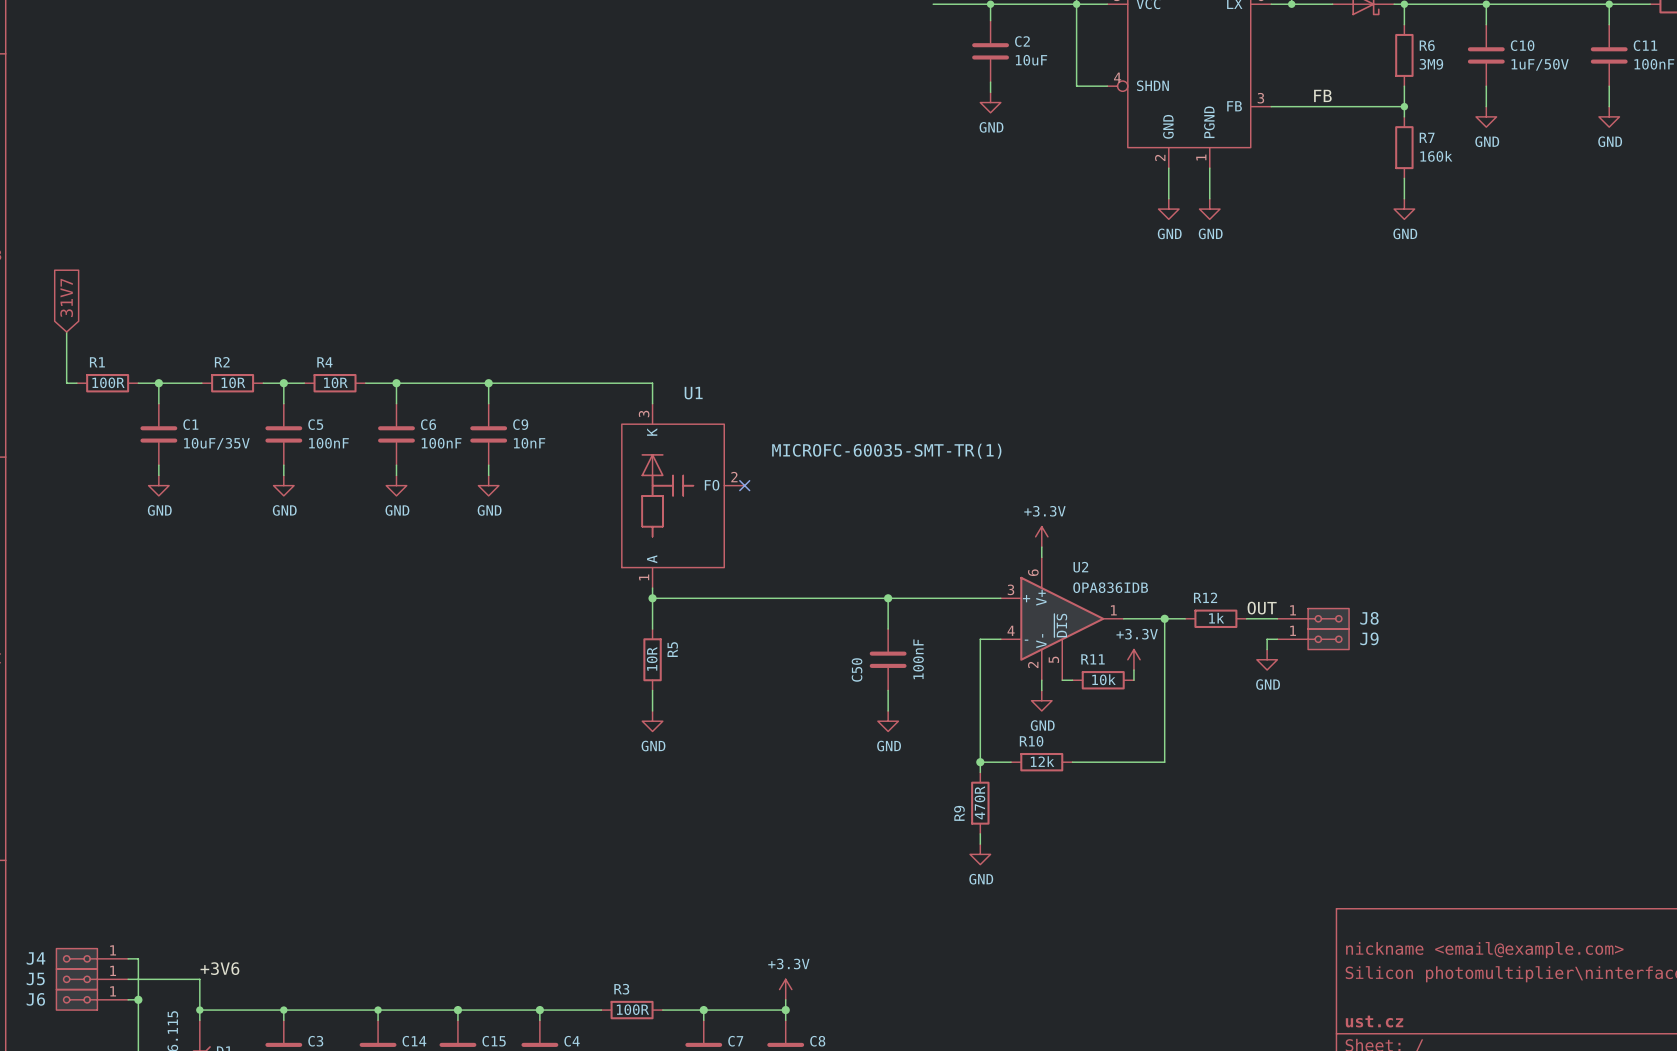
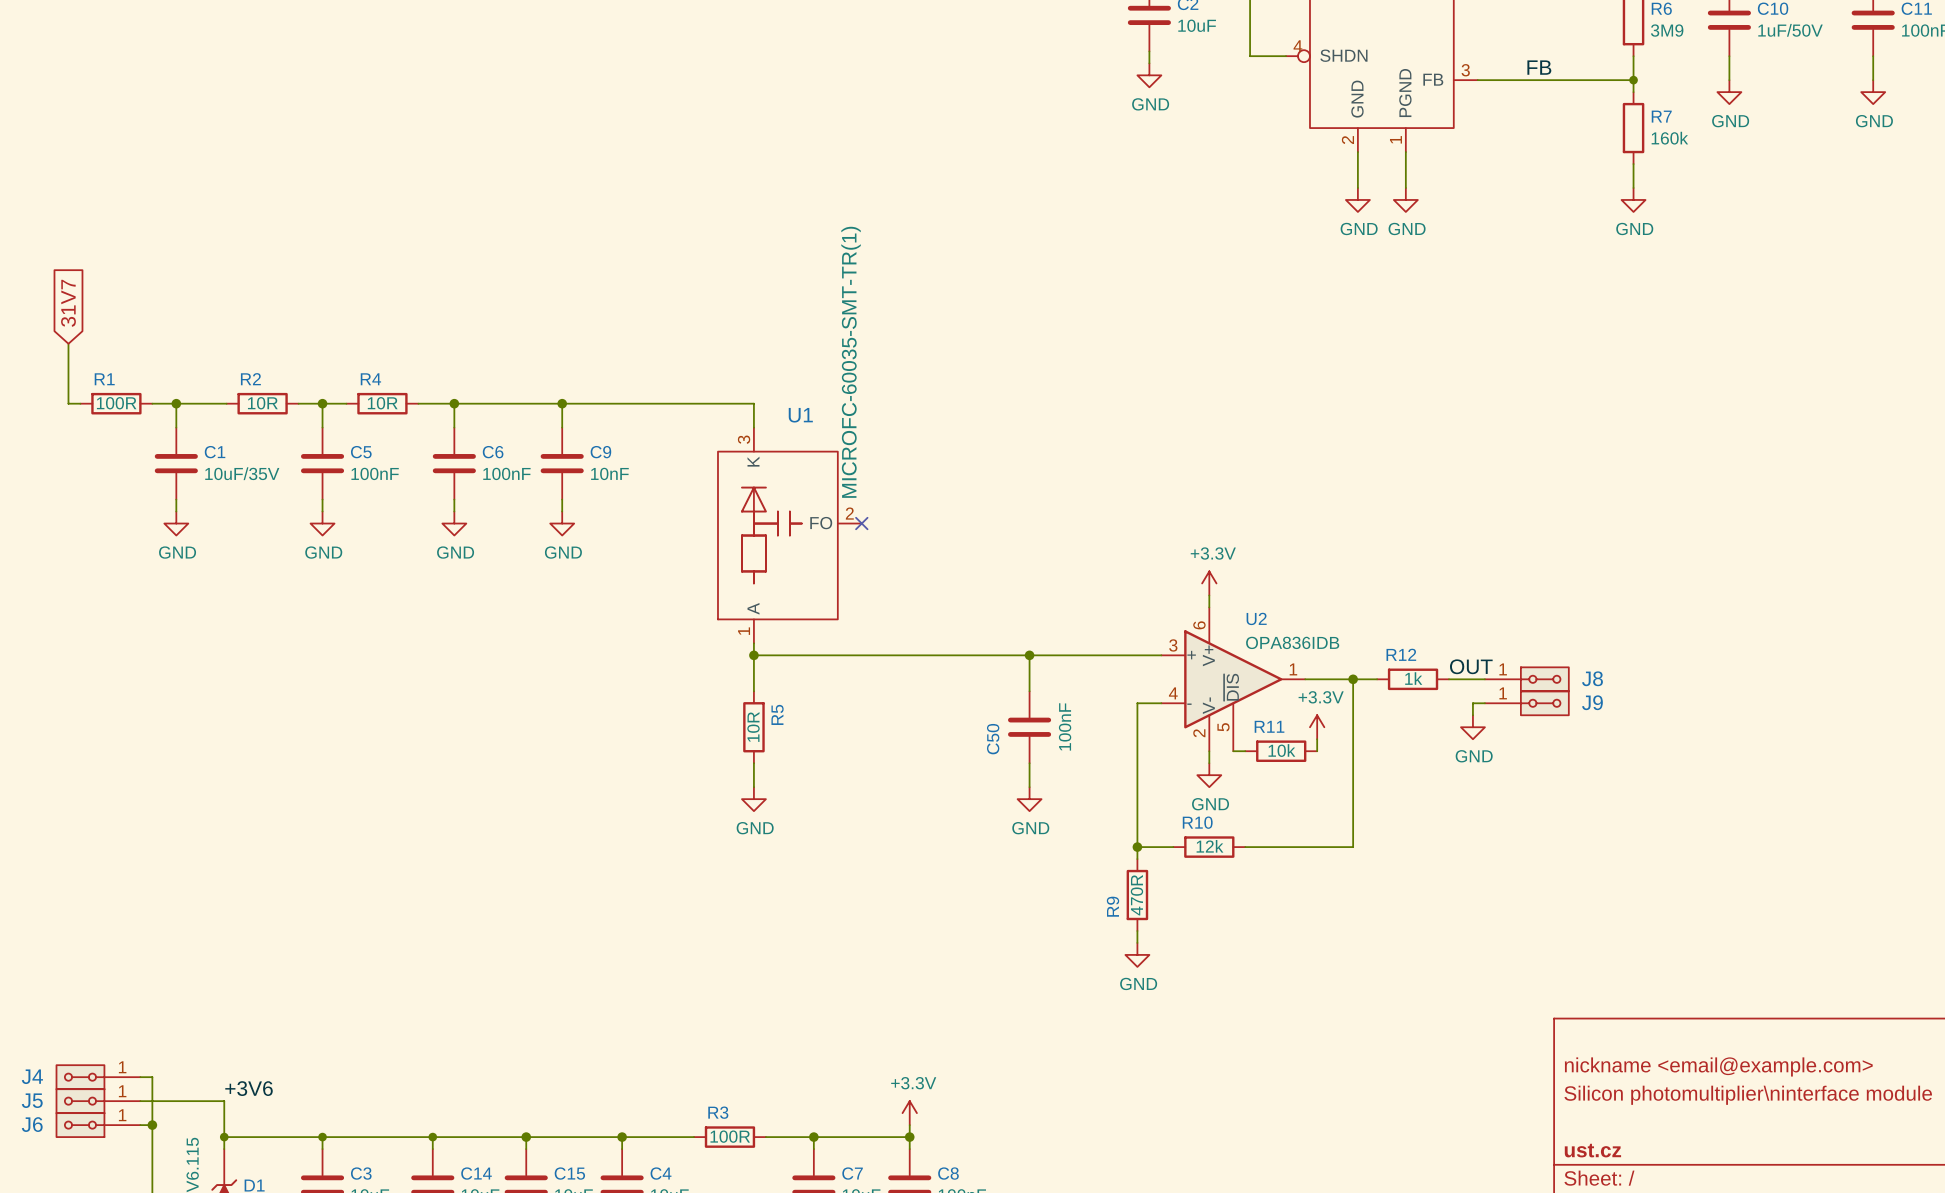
U1 value rotation: 0° (886, 451) -> 90° counterclockwise (851, 362)

